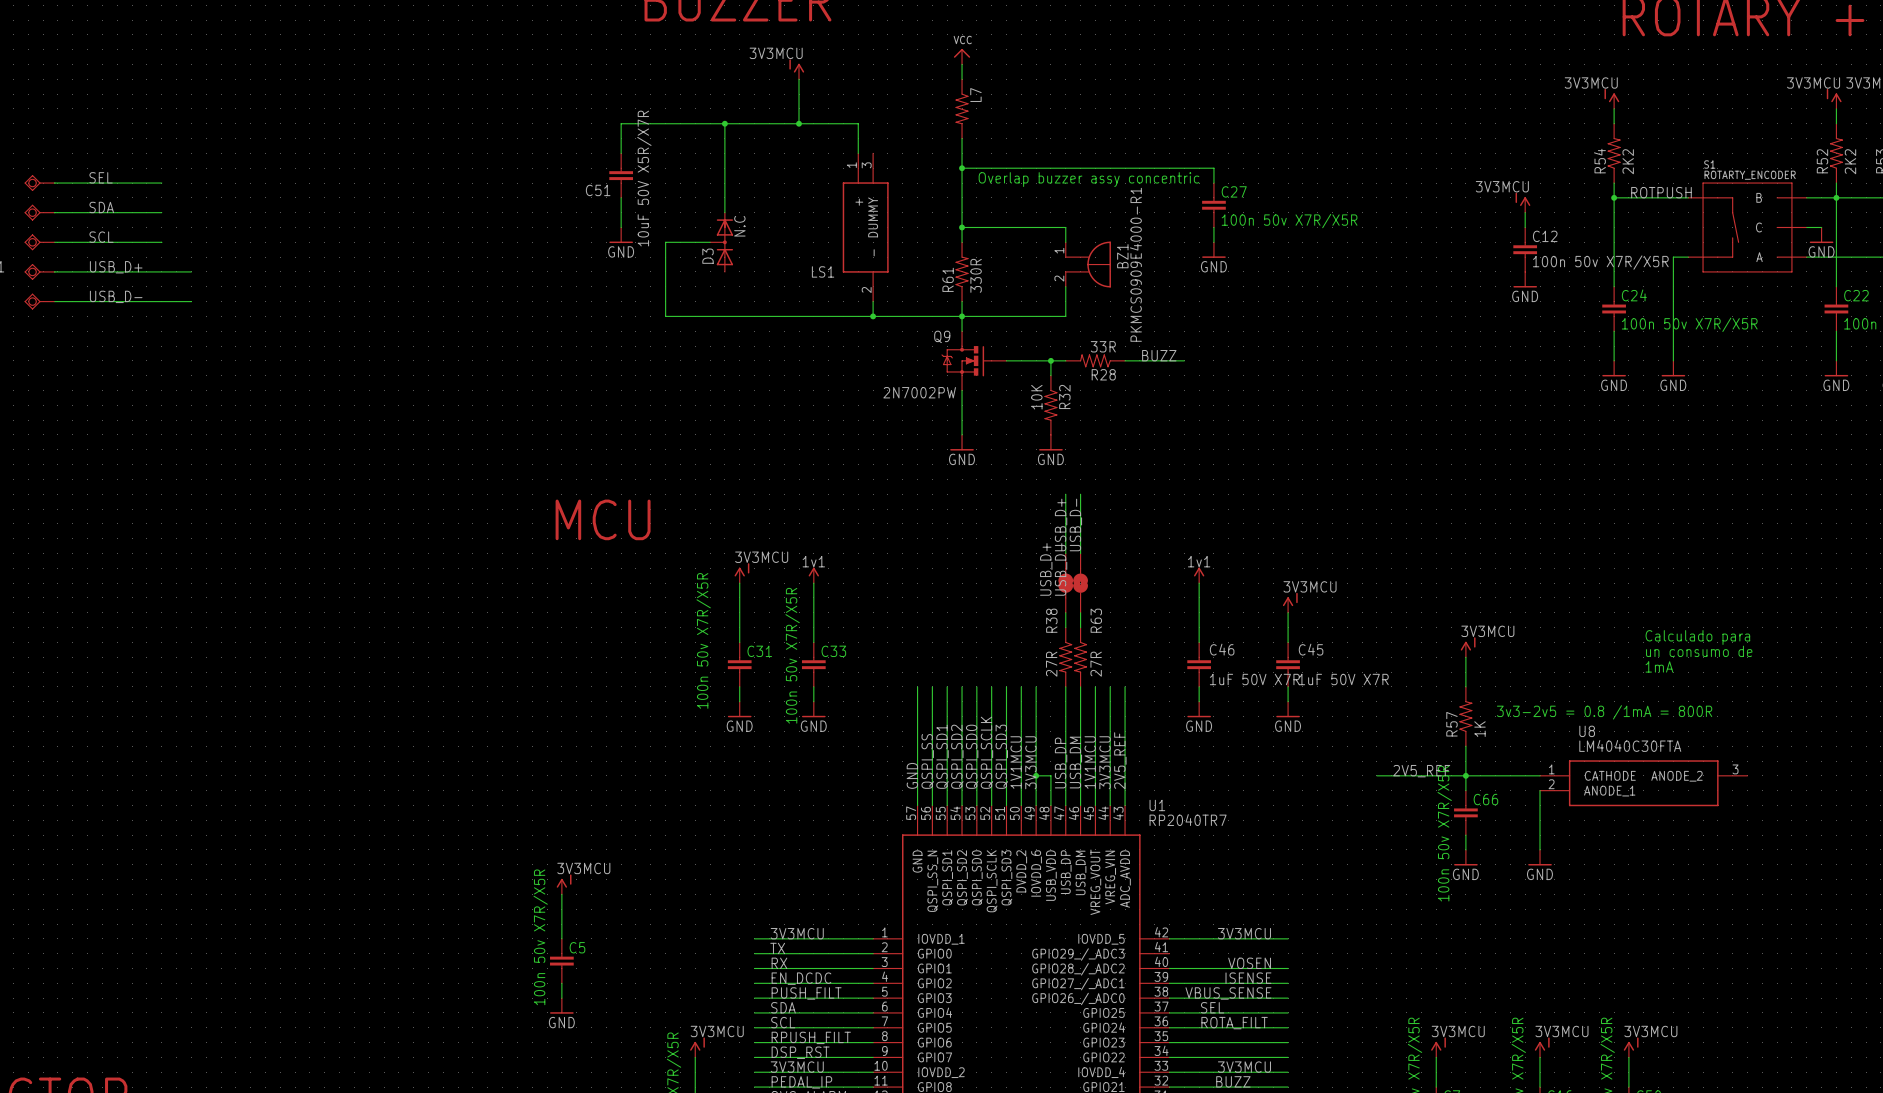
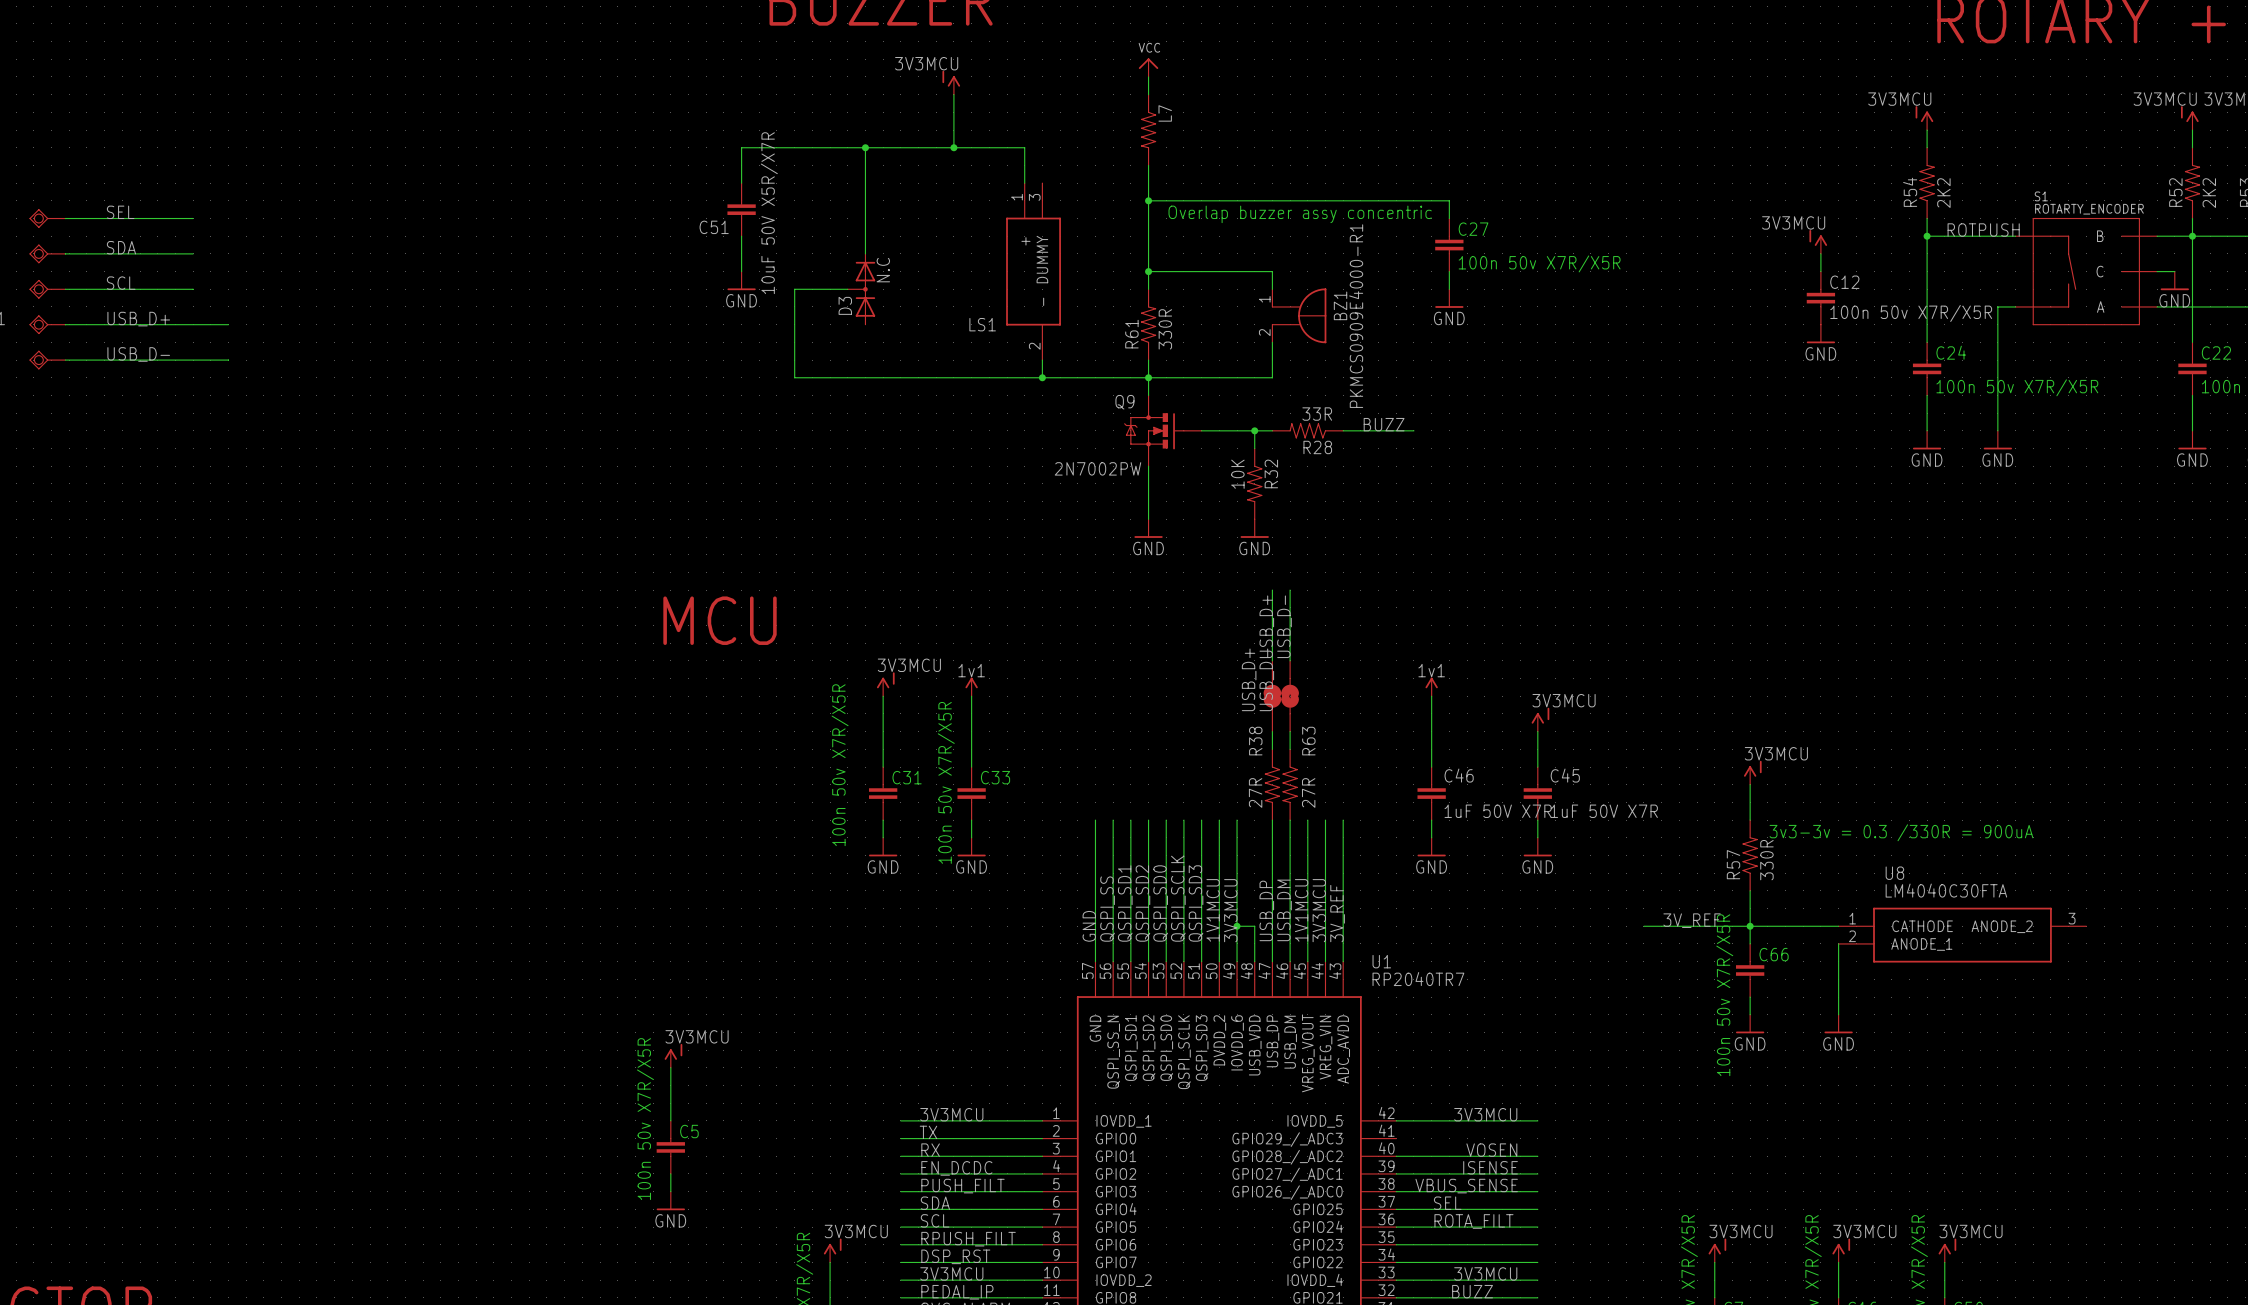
text: Calculado para (1697, 637) -> none
text: un consumo de (1699, 651) -> none
text: 1mA (1659, 666) -> none
text: 3v3-2v5 = 0.8 /1mA = 800R (1604, 712) -> 3v3-3v = 0.3 /330R = 900uA (1901, 832)
R57 value: 1K (1479, 729) -> 330R (1766, 860)
label: 2V5_REF (1120, 760) -> 3V_REF (1337, 913)
label: 2V5_REF (1421, 771) -> 3V_REF (1692, 920)

